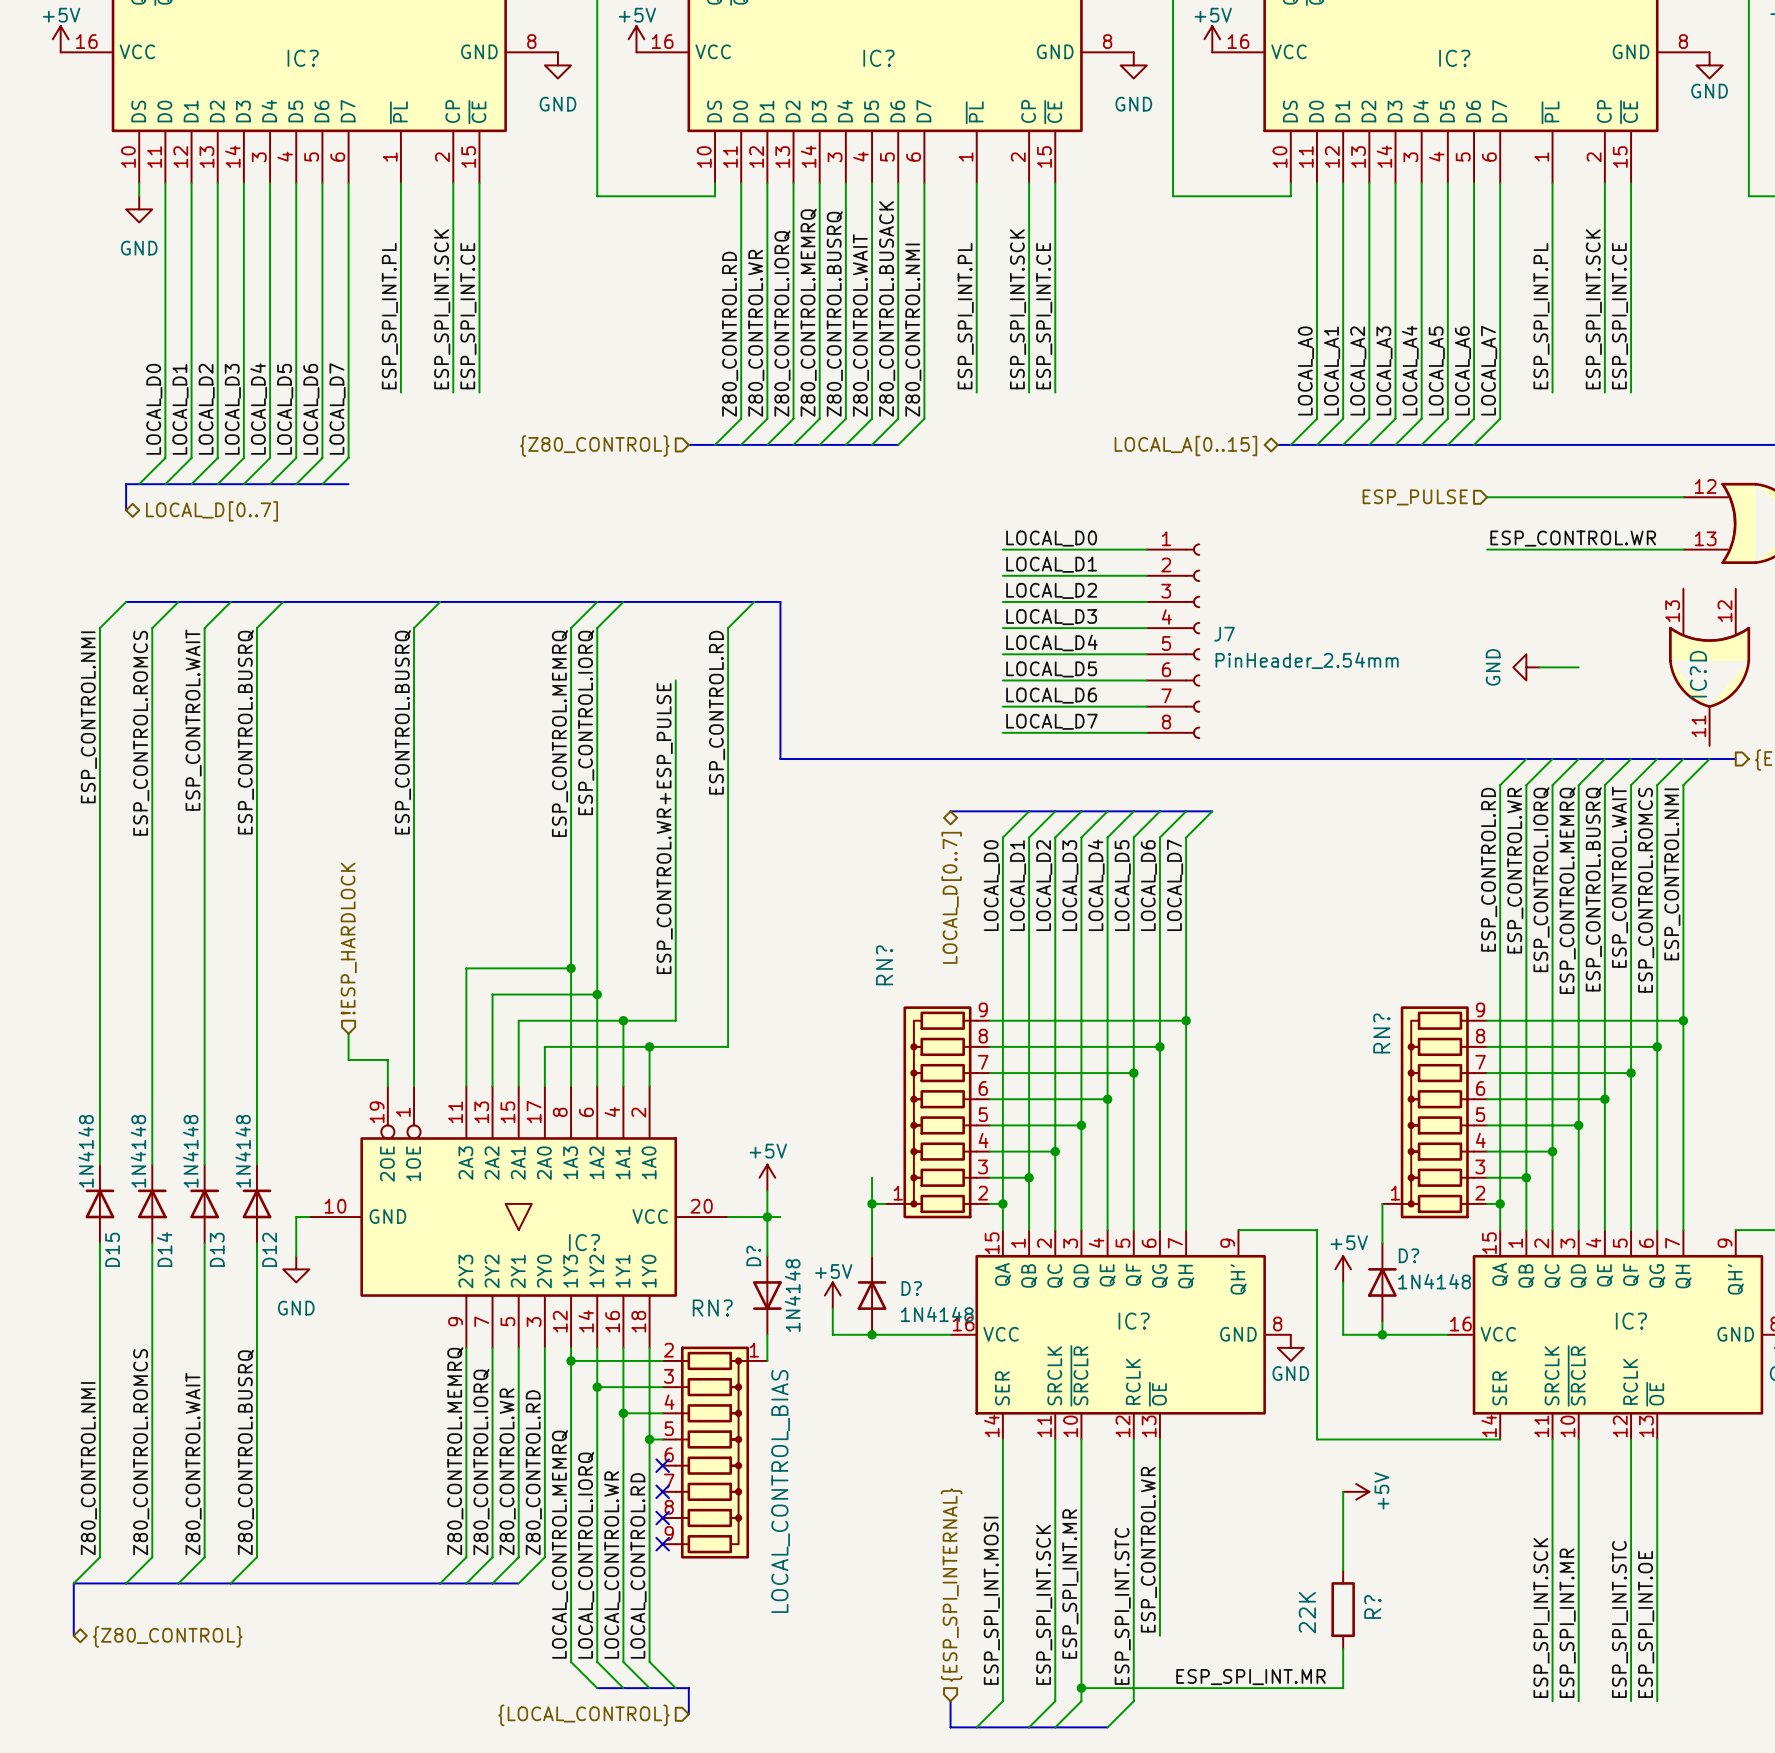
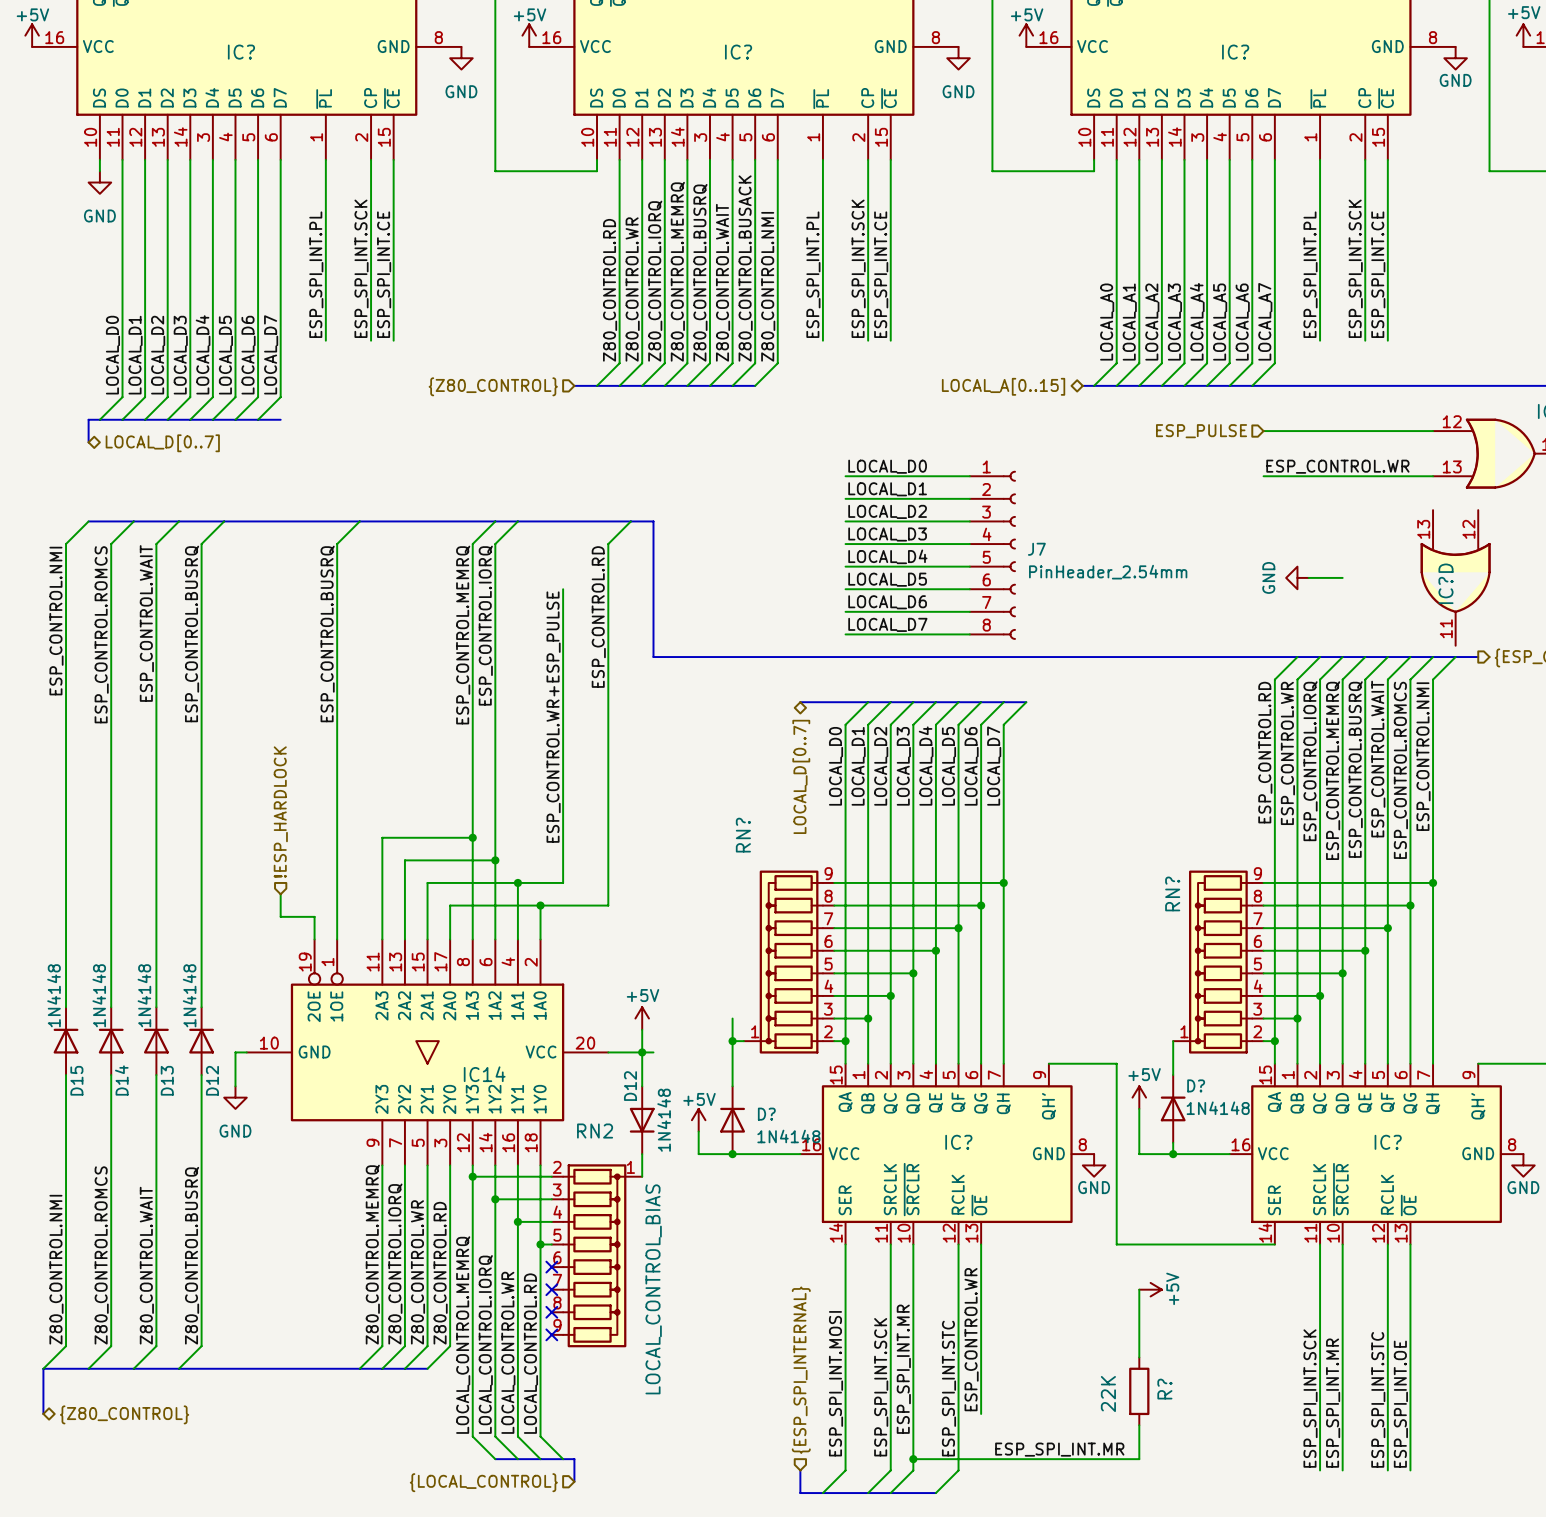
IC? name: IC? (584, 1242) -> IC14 (484, 1074)
D? name: D? (753, 1255) -> D12 (630, 1086)
RN? name: RN? (712, 1308) -> RN2 (595, 1131)

